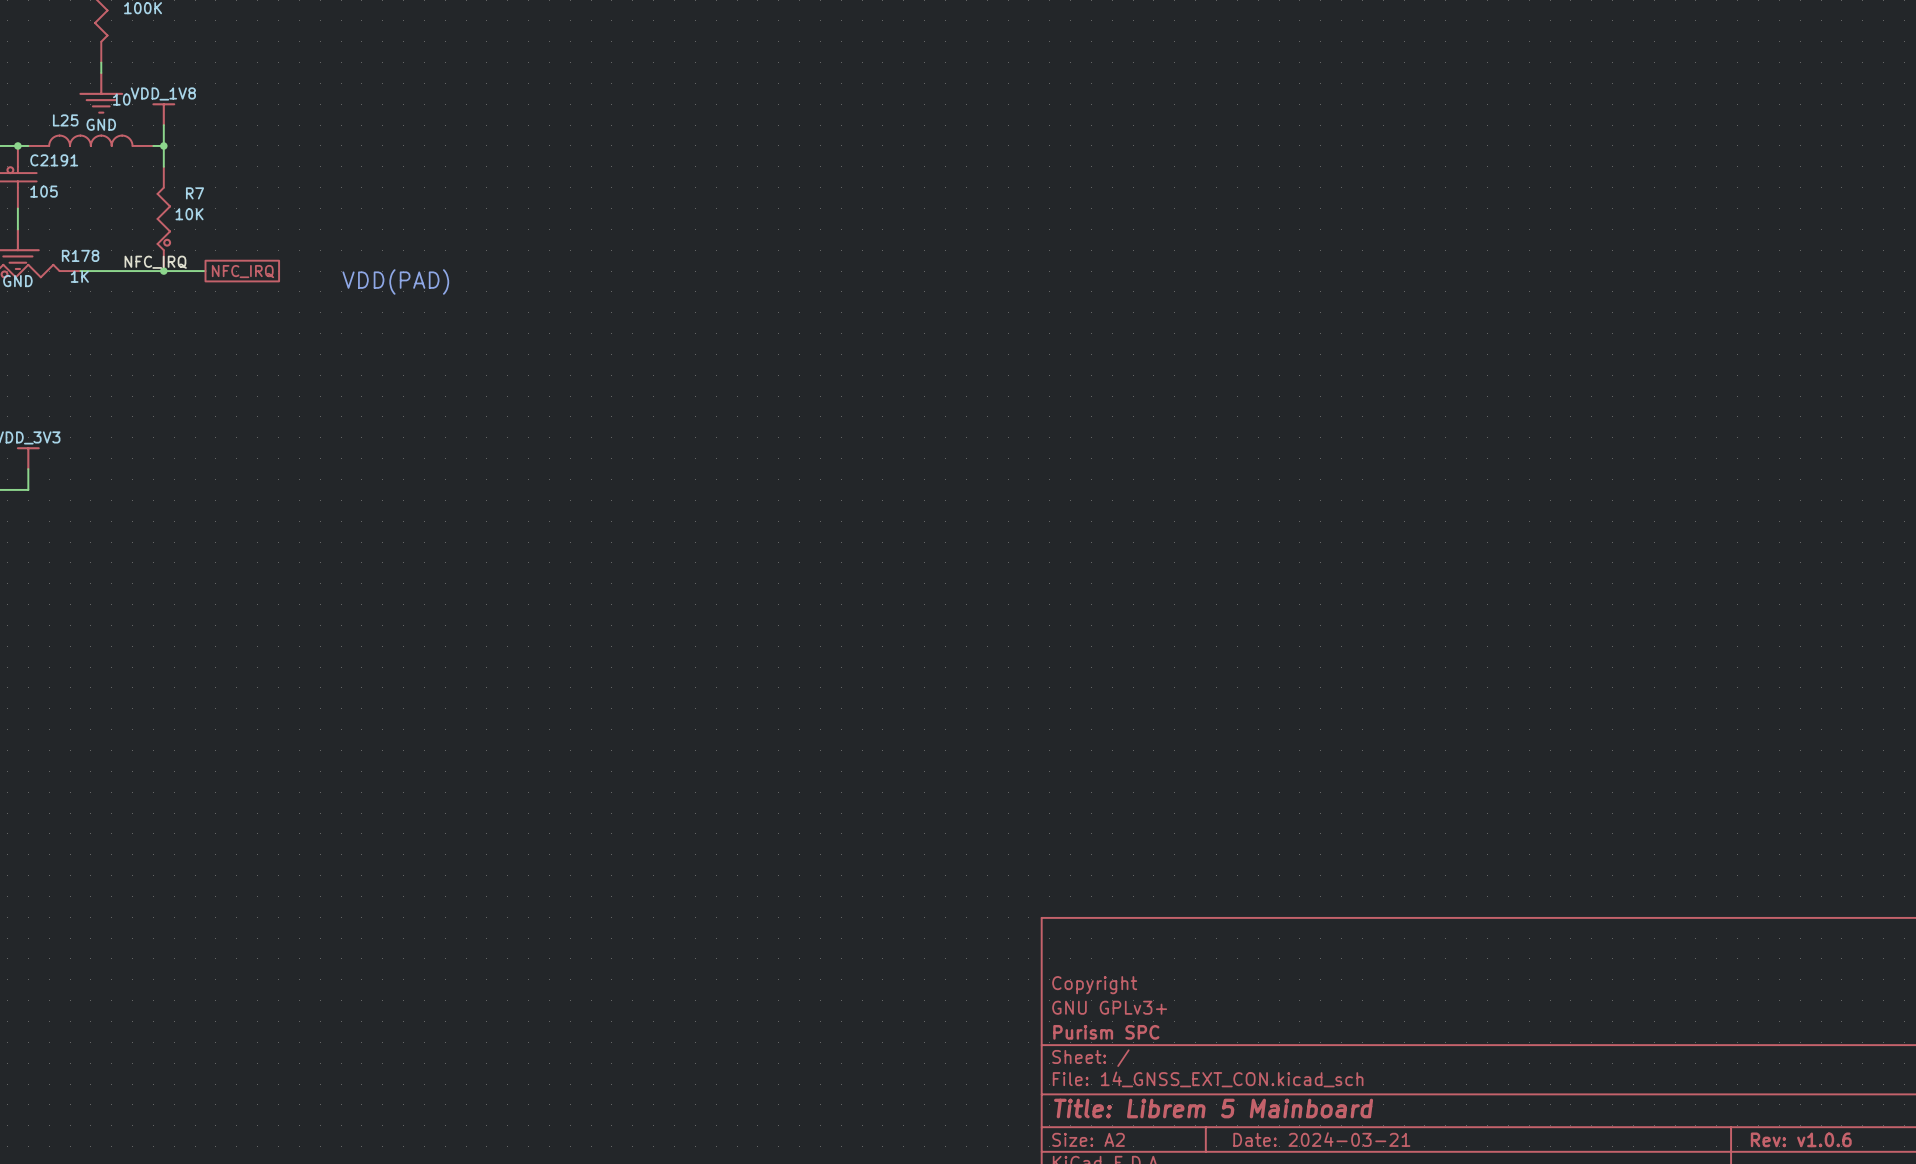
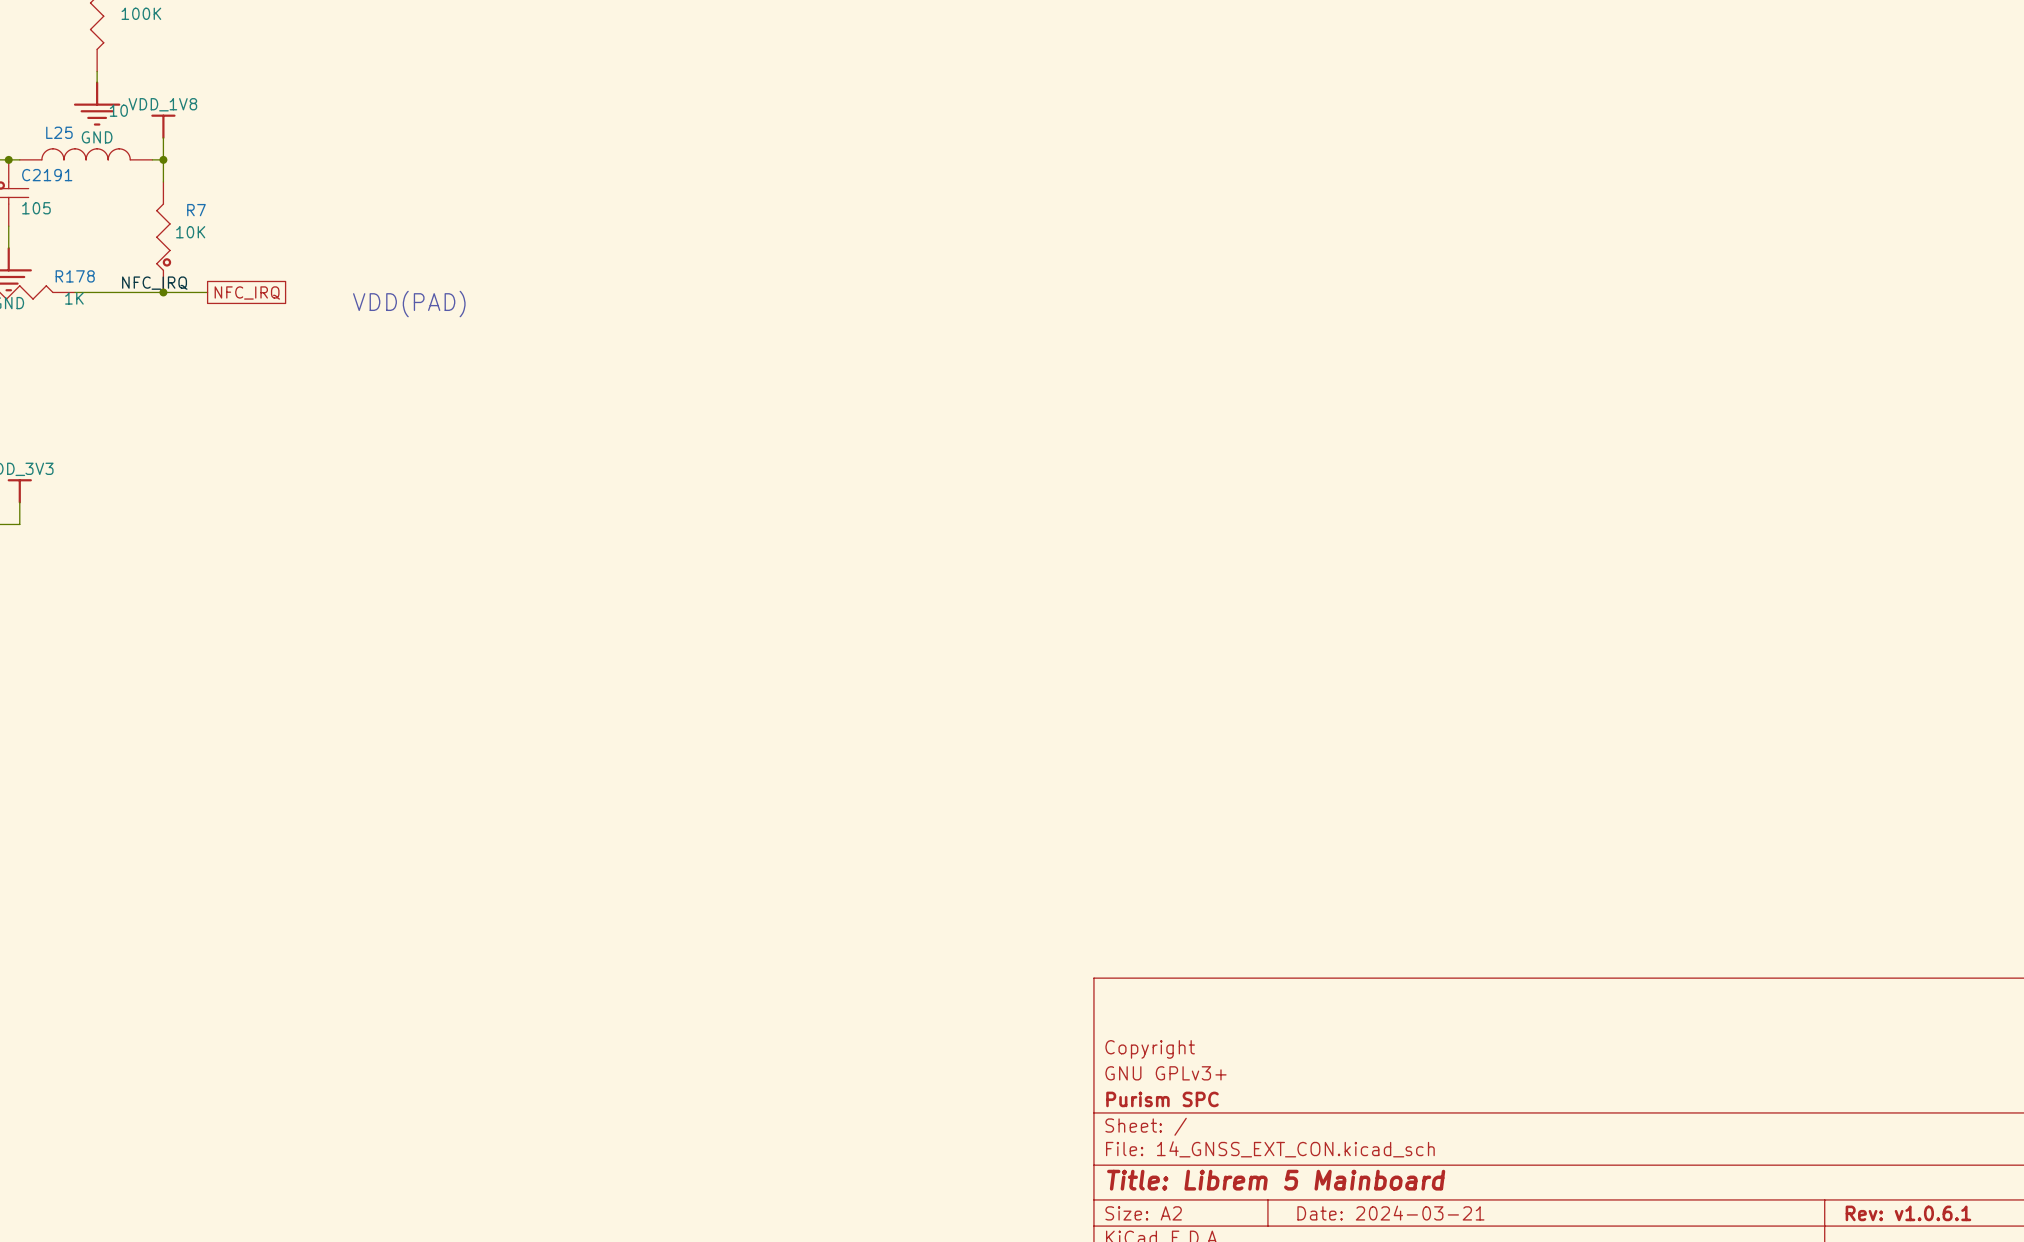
title block: Rev: v1.0.6 (1801, 1139) -> Rev: v1.0.6.1 (1908, 1213)

